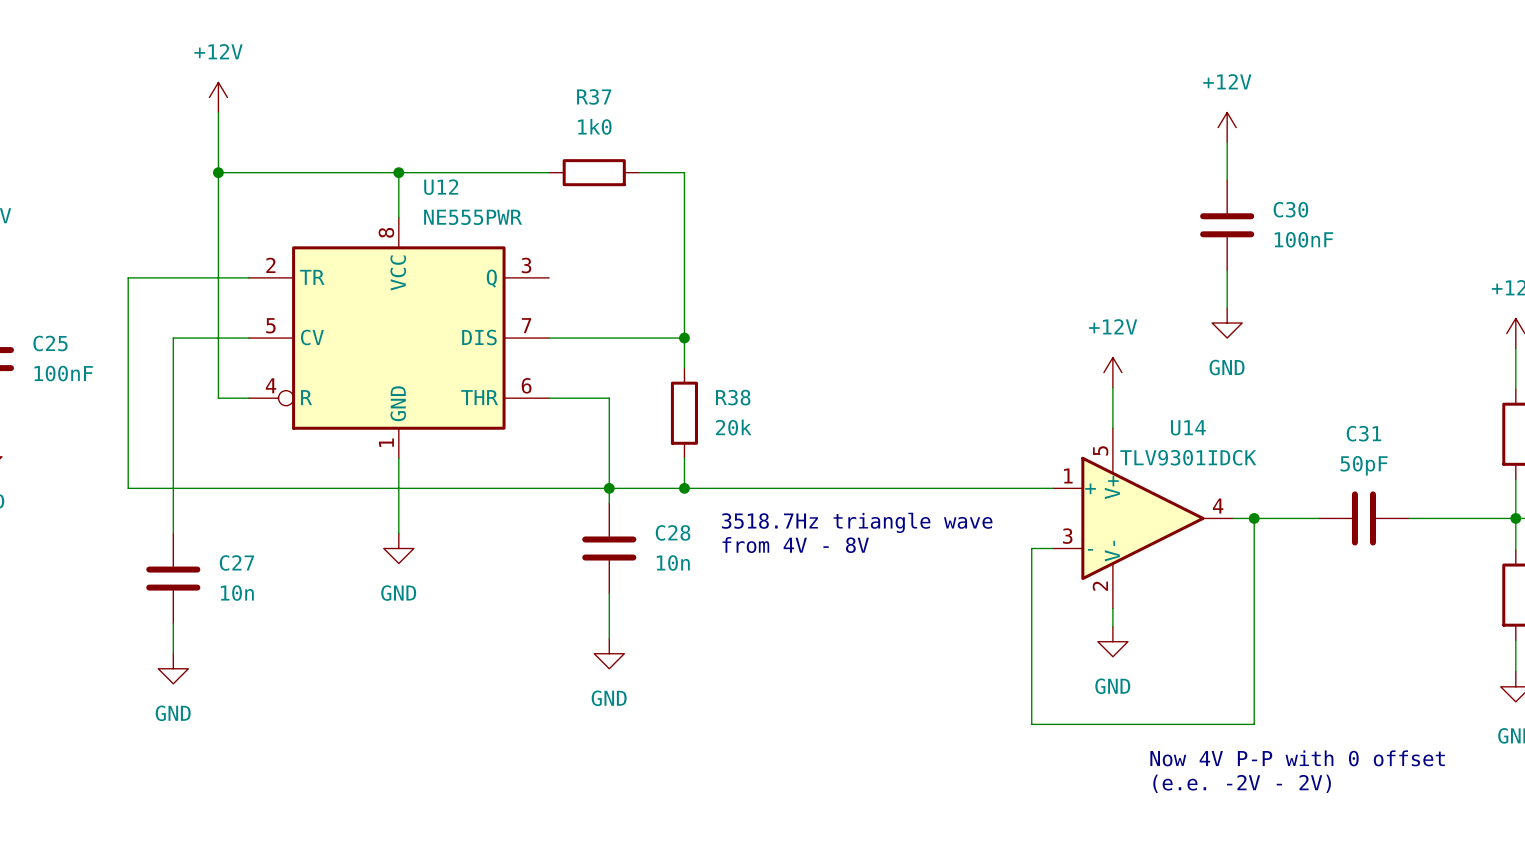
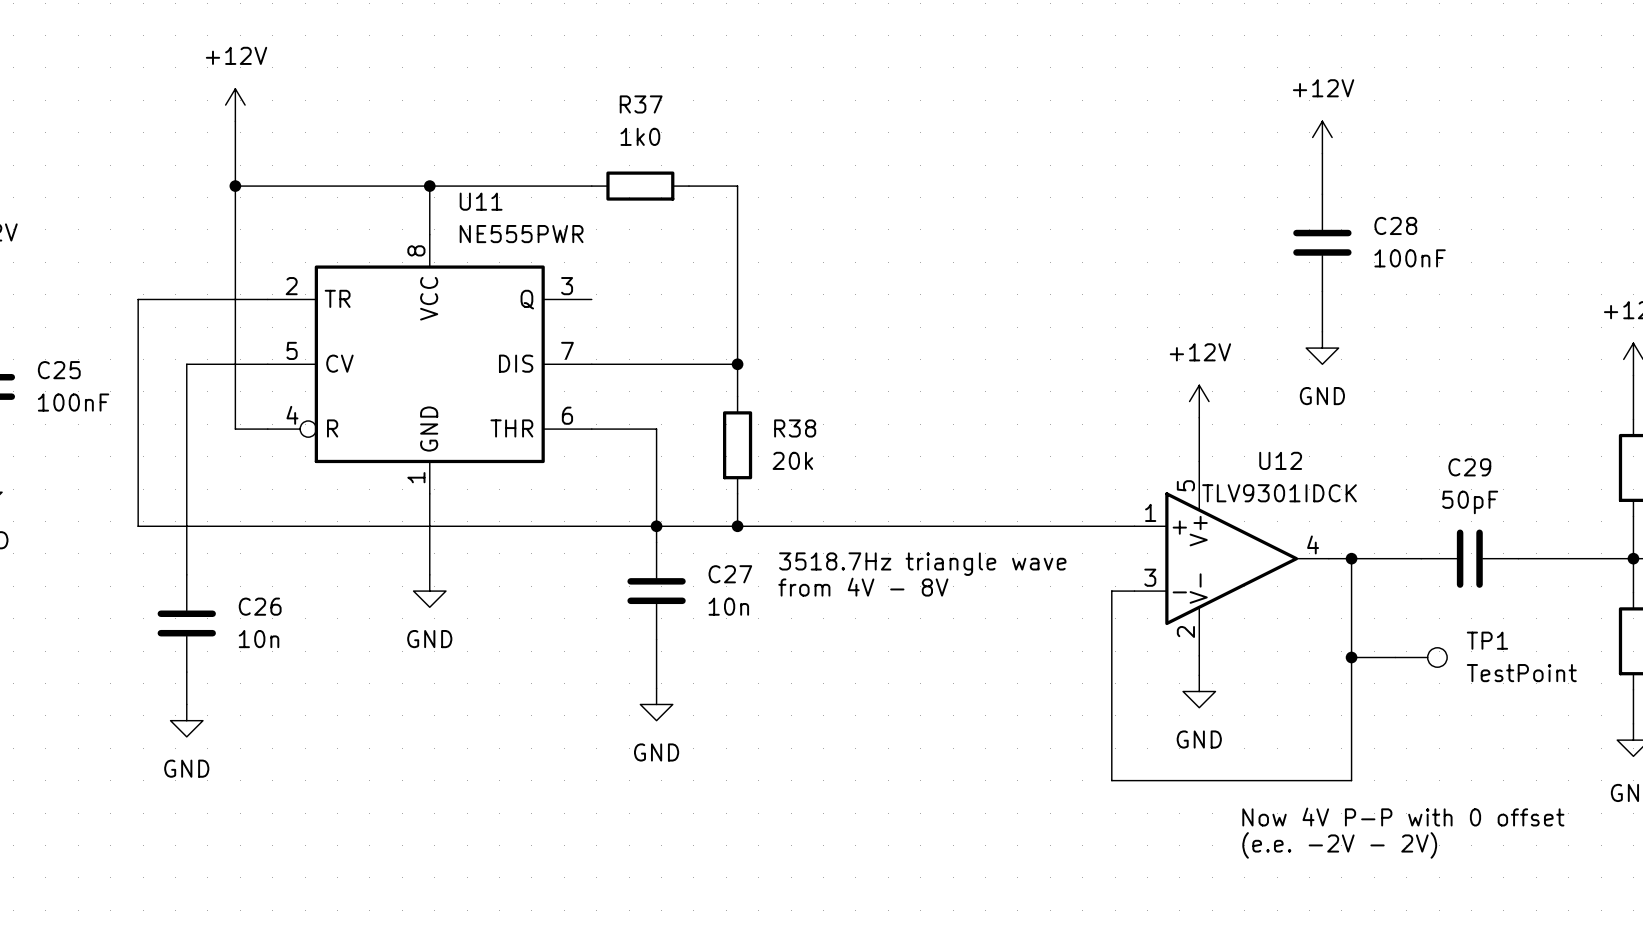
U12 name: U12 (441, 187) -> U11 (481, 201)
C30 name: C30 (1290, 209) -> C28 (1395, 225)
U14 name: U14 (1188, 427) -> U12 (1280, 460)
C31 name: C31 (1363, 433) -> C29 (1469, 467)
C28 name: C28 (673, 532) -> C27 (730, 574)
C27 name: C27 (236, 562) -> C26 (260, 606)
wire: none -> (1351, 657) (1395, 657)
junction: none -> (1351, 657)
TP1: none -> TestPoint (1421, 657)

